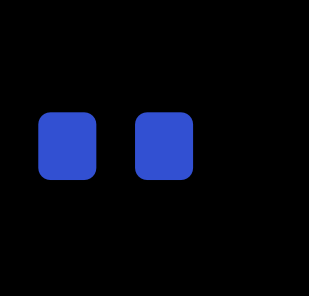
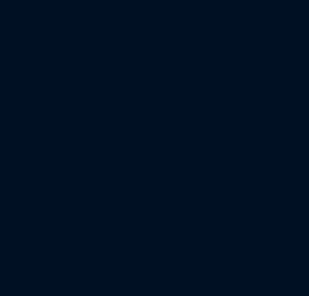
part: (115, 146) -> none

